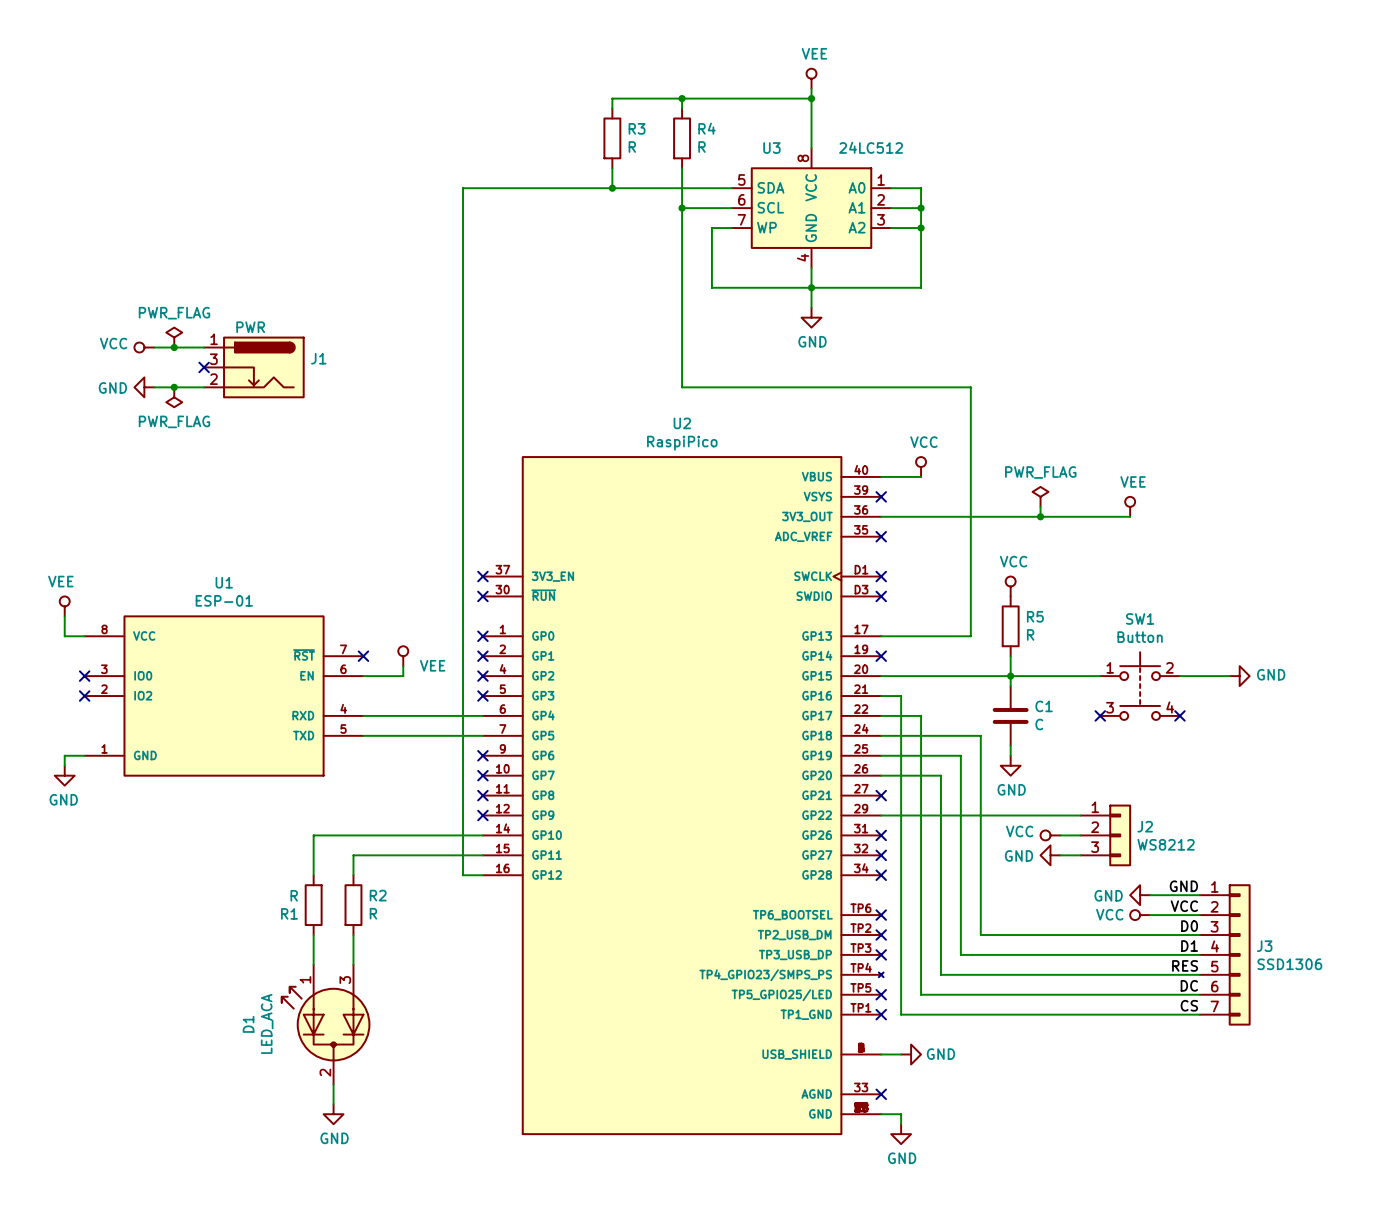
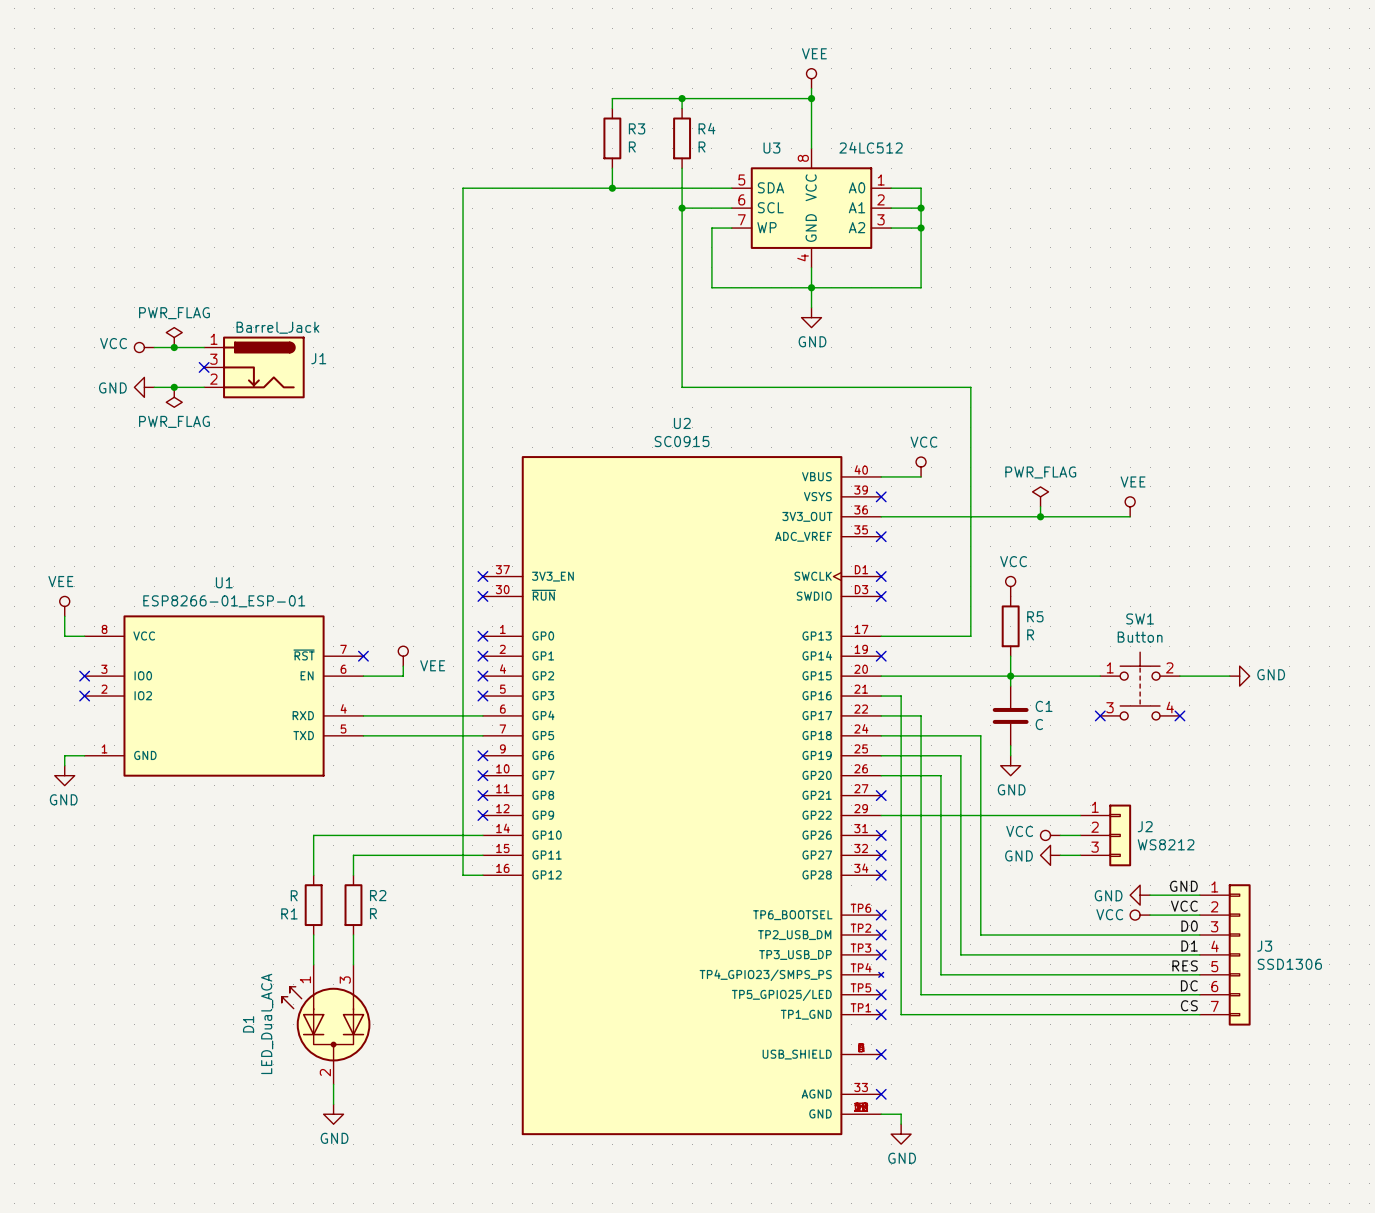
J1 value: PWR (250, 327) -> Barrel_Jack (277, 327)
U2 value: RaspiPico (682, 443) -> SC0915 (682, 441)
U1 value: ESP-01 (224, 600) -> ESP8266-01_ESP-01 (224, 601)
D1 value: LED_ACA (267, 1023) -> LED_Dual_ACA (267, 1023)
wire: (881, 1054) (901, 1054) -> none
no-connect mark: none -> (881, 1054)
power symbol: GND (911, 1054) -> none

